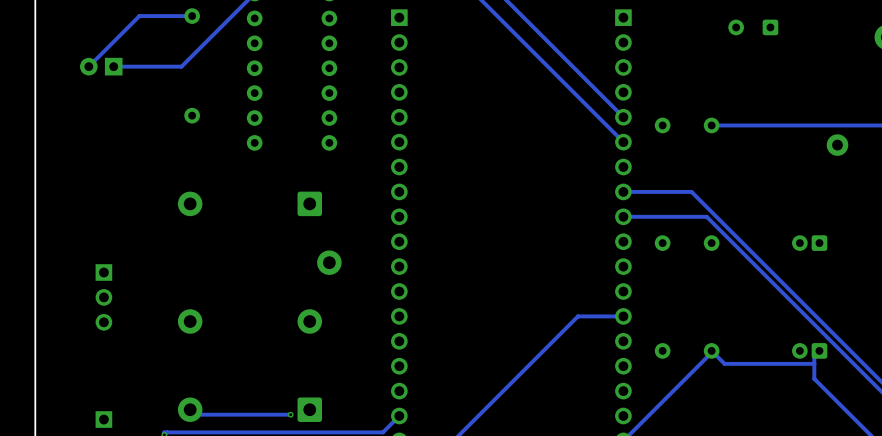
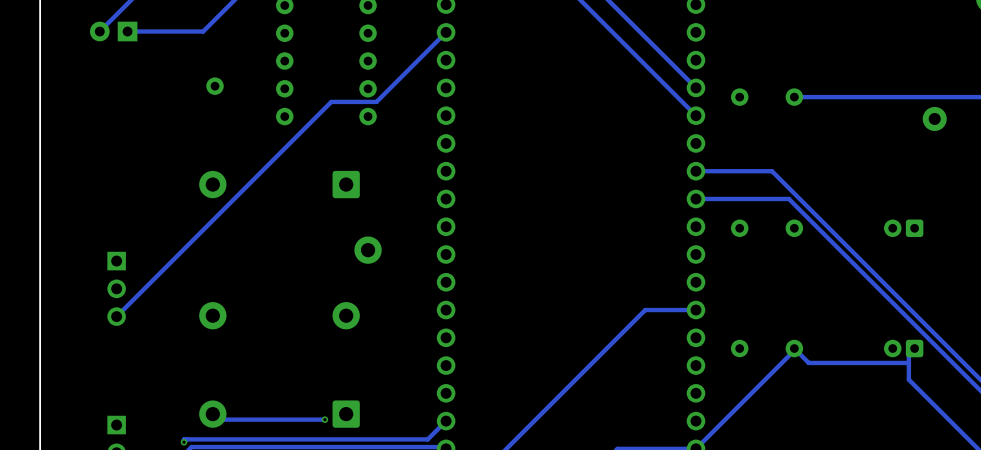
track: none -> (446, 32) (376, 101) (331, 101) (116, 316)

